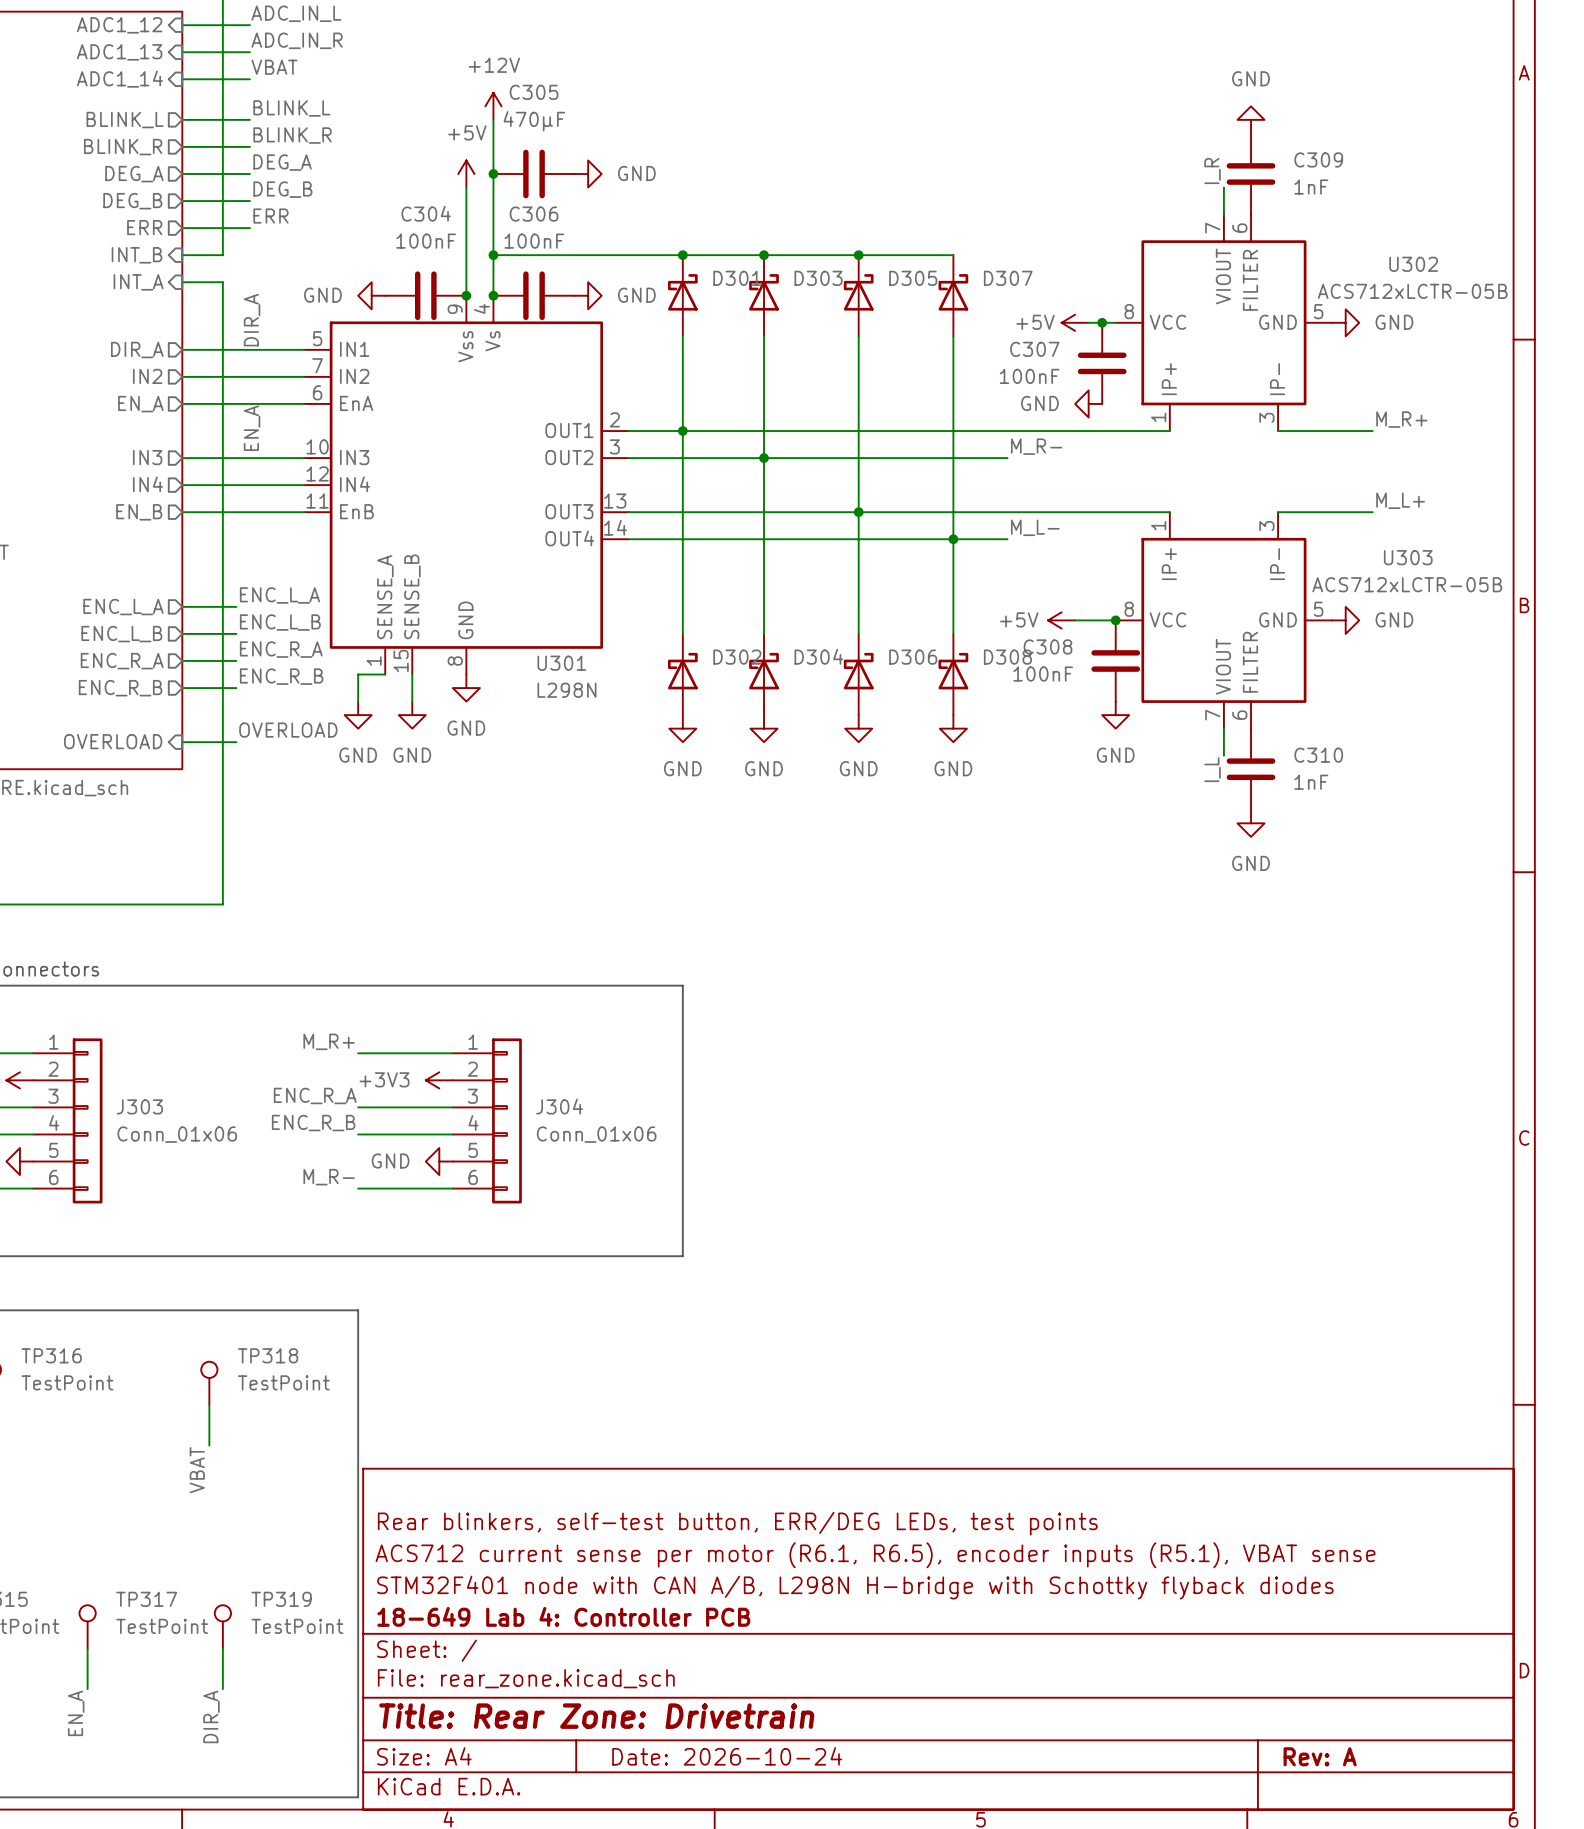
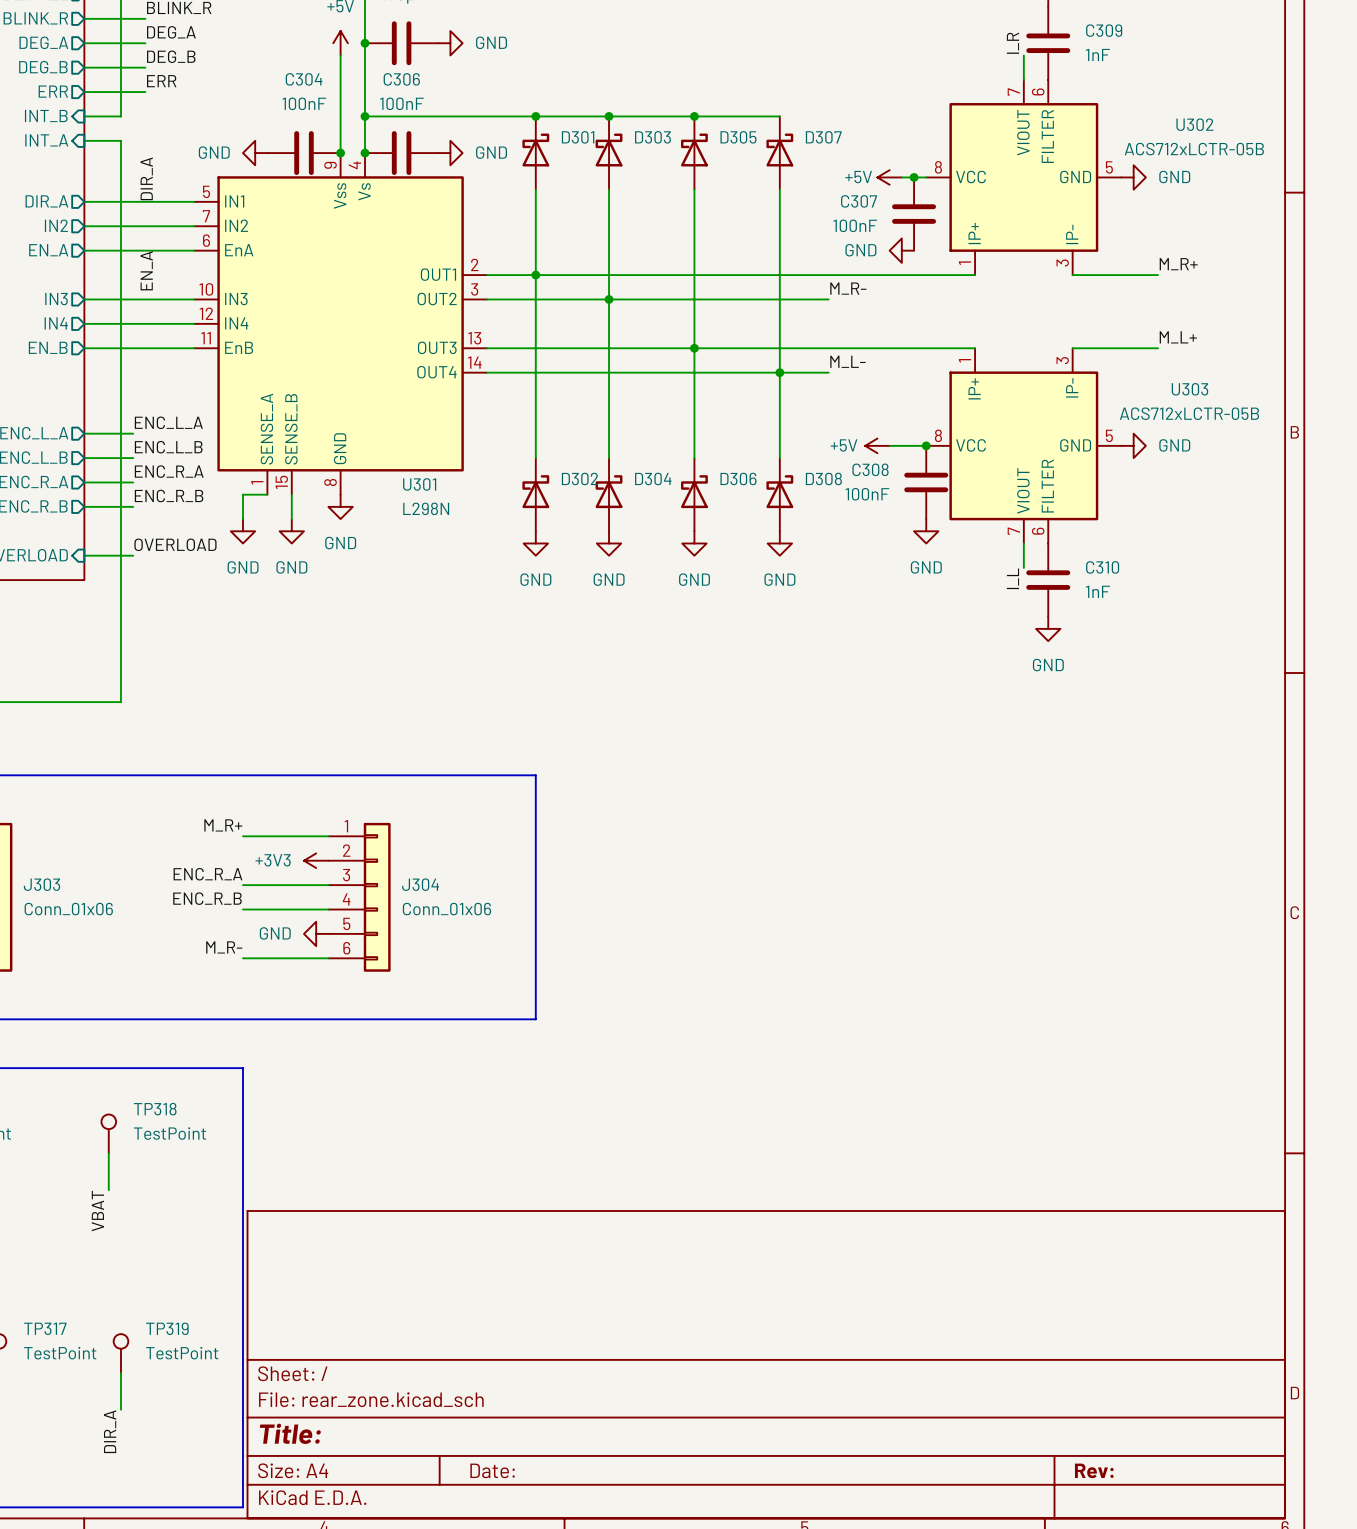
title block: Rear blinkers, self-test button, ERR/DEG LEDs, test points (737, 1523) -> none
title block: ACS712 current sense per motor (R6.1, R6.5), encoder inputs (R5.1), VBAT sense (875, 1555) -> none
title block: STM32F401 node with CAN A/B, L298N H-bridge with Schottky flyback diodes (855, 1587) -> none
title block: 18-649 Lab 4: Controller PCB (563, 1616) -> none
title block: Title: Rear Zone: Drivetrain (596, 1716) -> Title: (290, 1433)
title block: Date: 2026-10-24 (727, 1756) -> Date: (492, 1470)
title block: Rev: A (1320, 1756) -> Rev: (1094, 1470)

